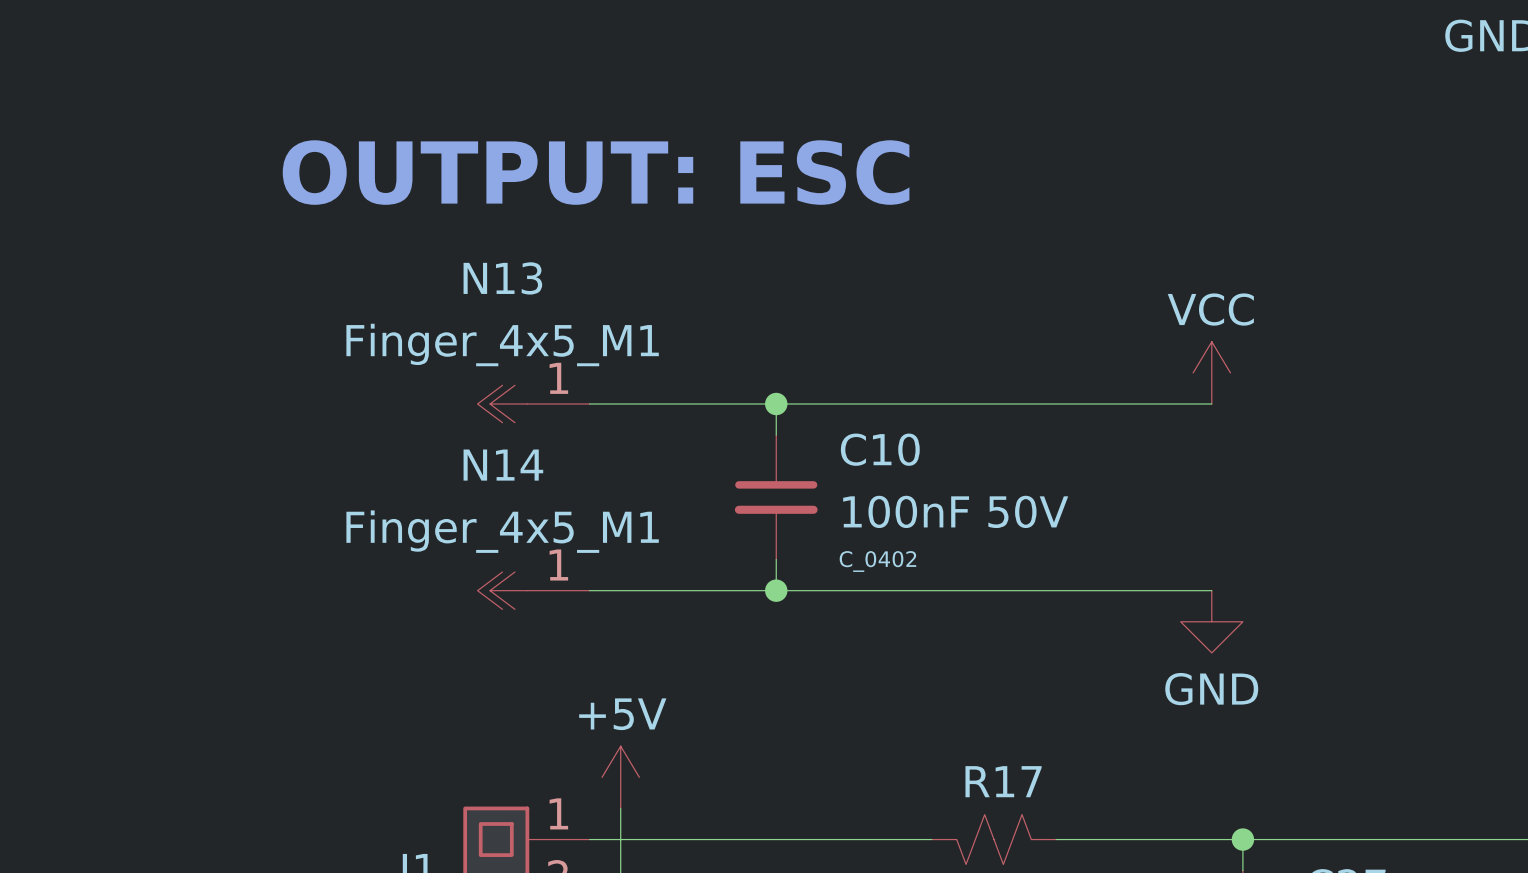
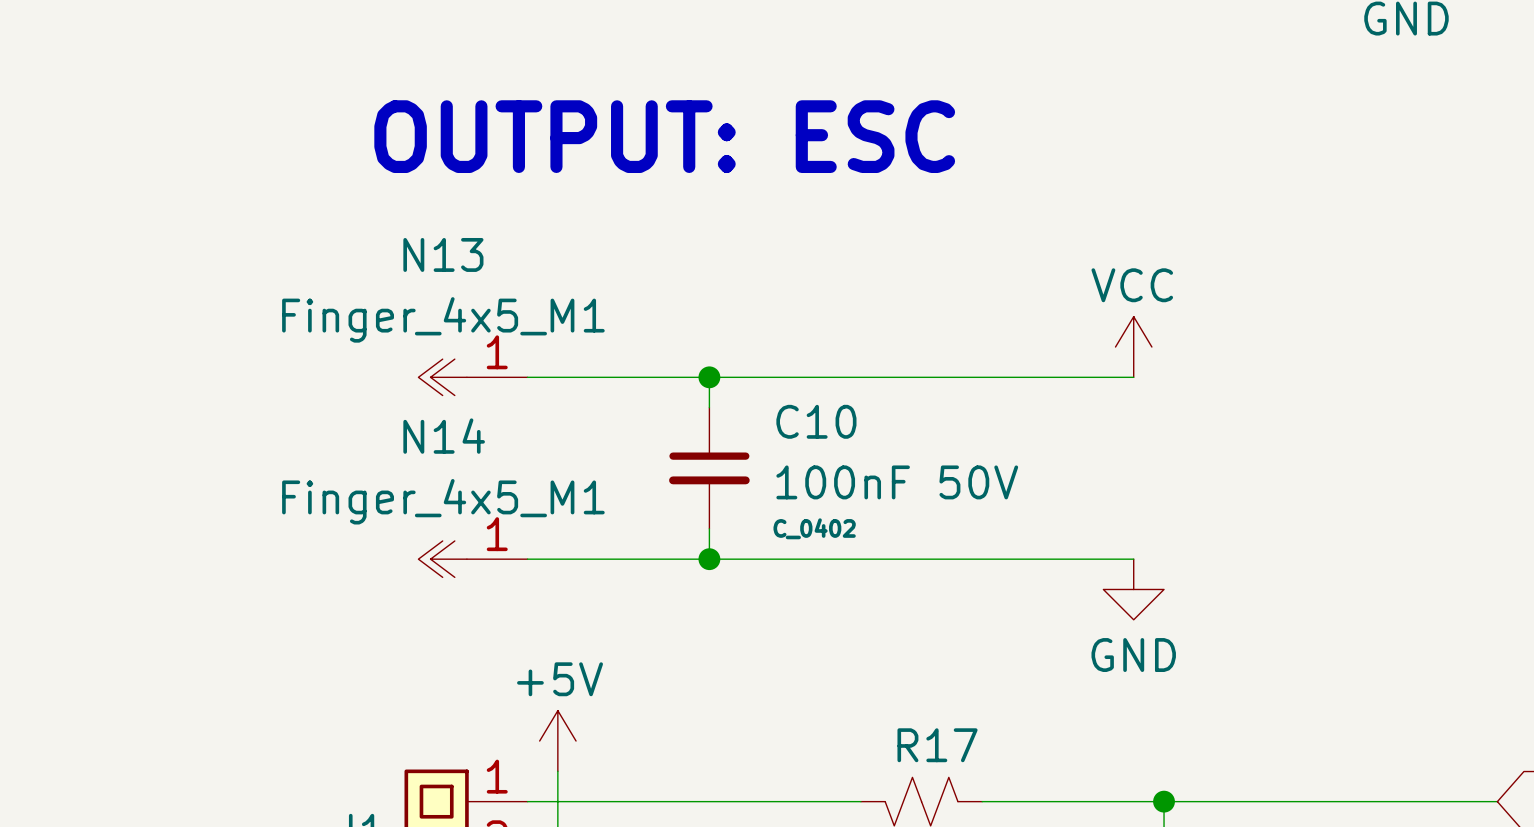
text position: OUTPUT: ESC (596, 172) -> OUTPUT: ESC (664, 136)

